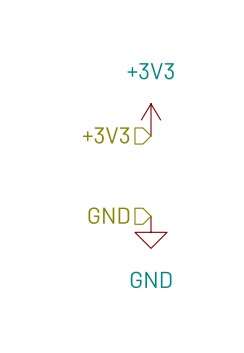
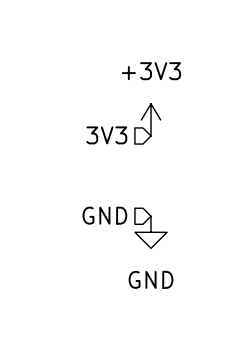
hierarchical label: +3V3 (106, 135) -> 3V3 (106, 135)

